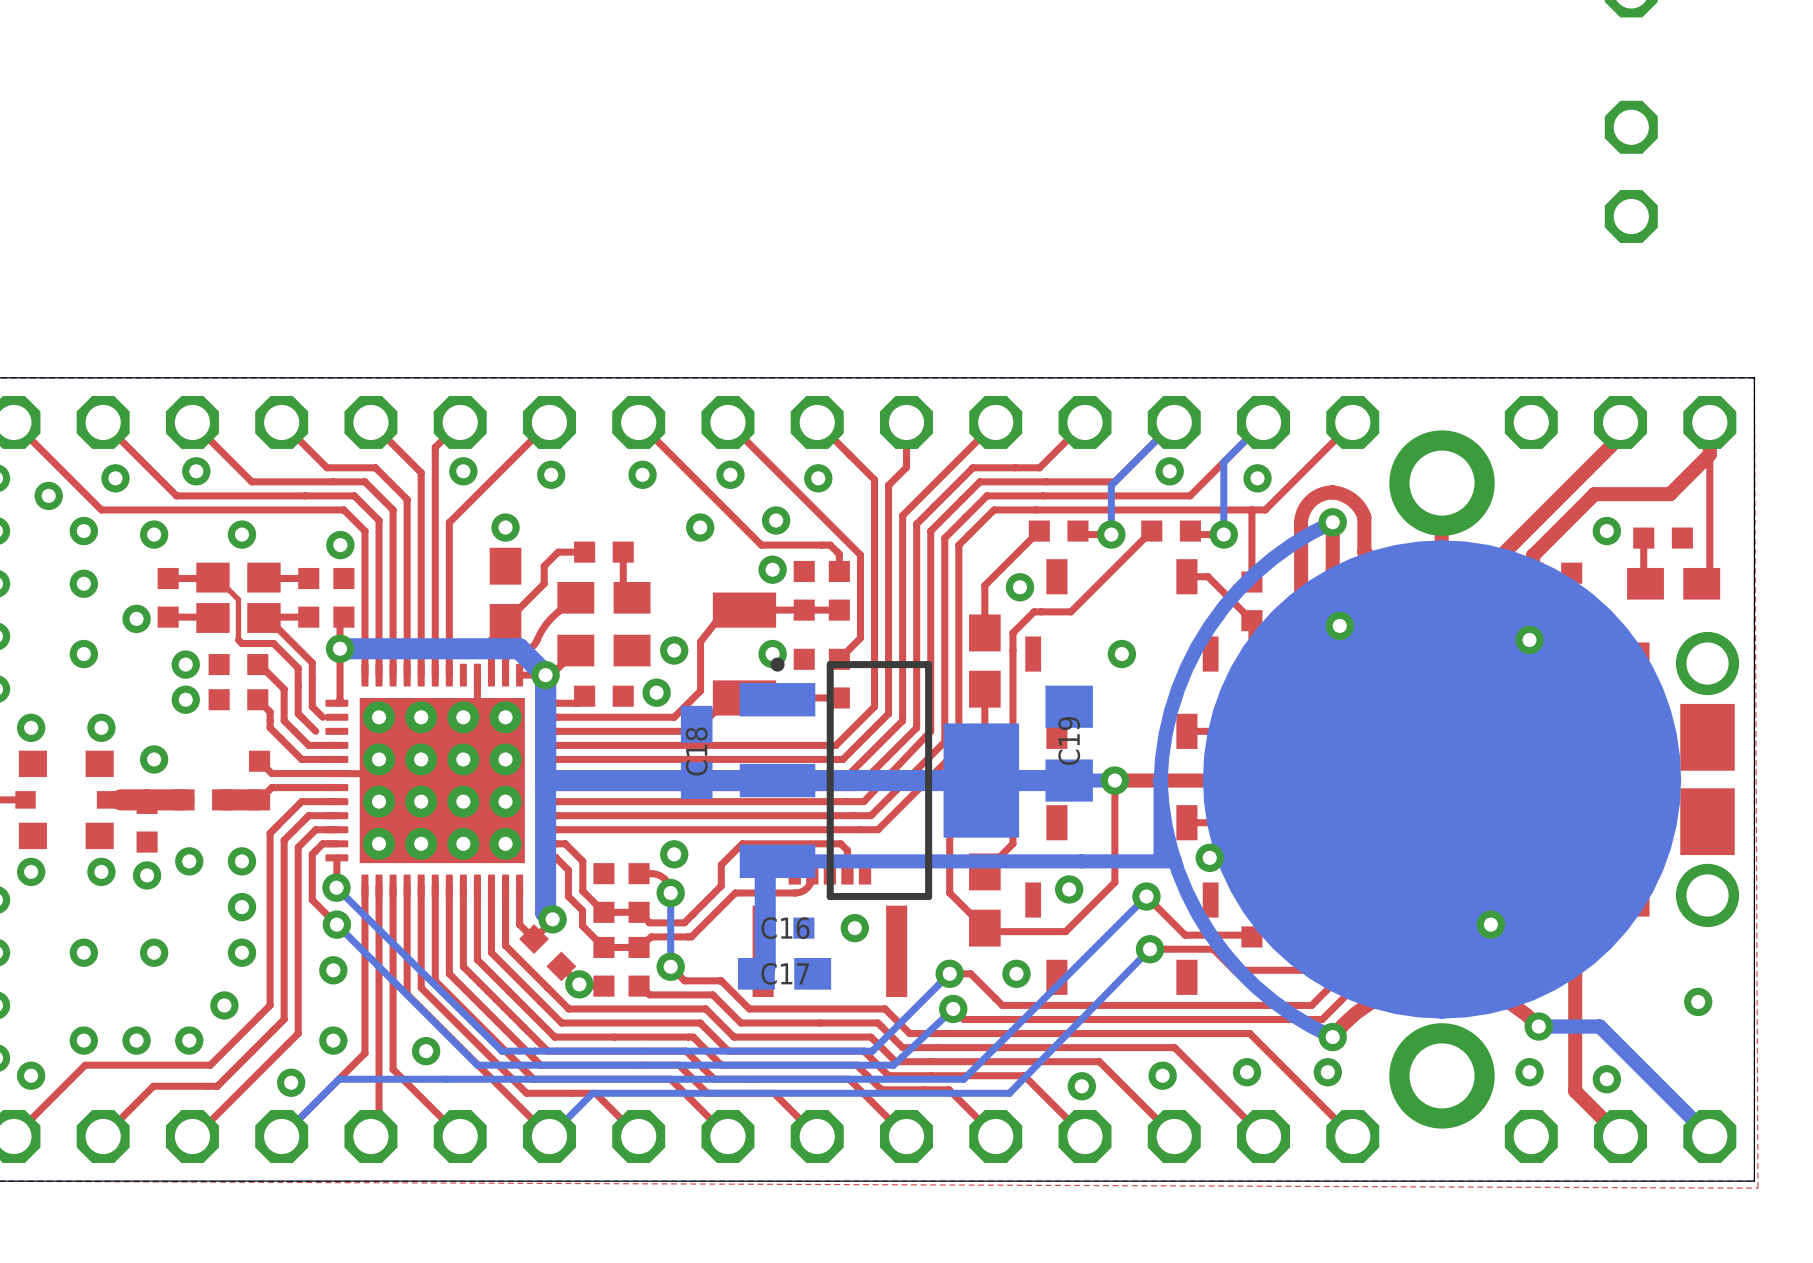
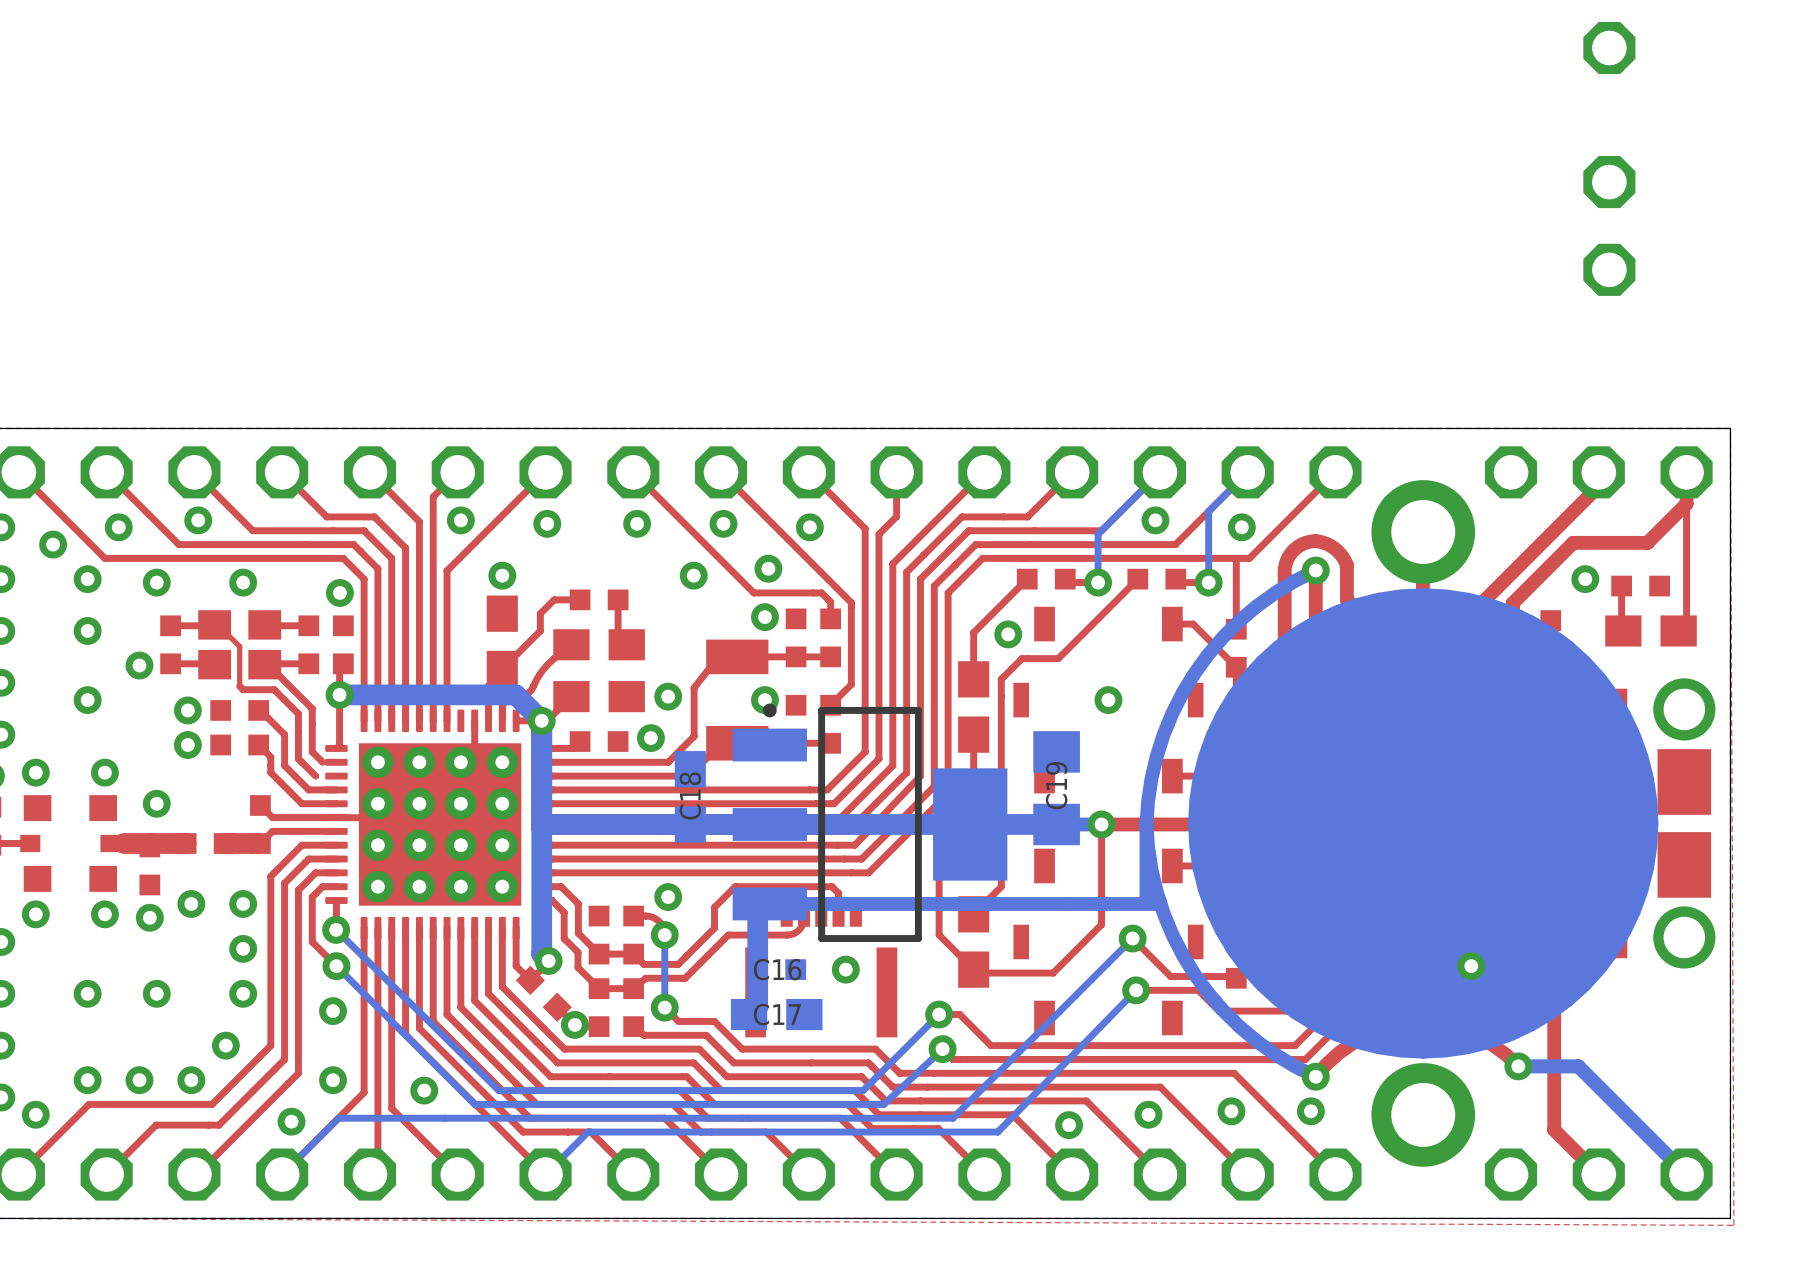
via: (1339, 625) -> none
via: (1529, 639) -> none
via: (1209, 857) -> none
via: (1069, 889) -> none
via: (1016, 973) -> none
via: (1698, 1001) -> none
via: (1529, 1072) -> none
via: (1606, 1079) -> none

